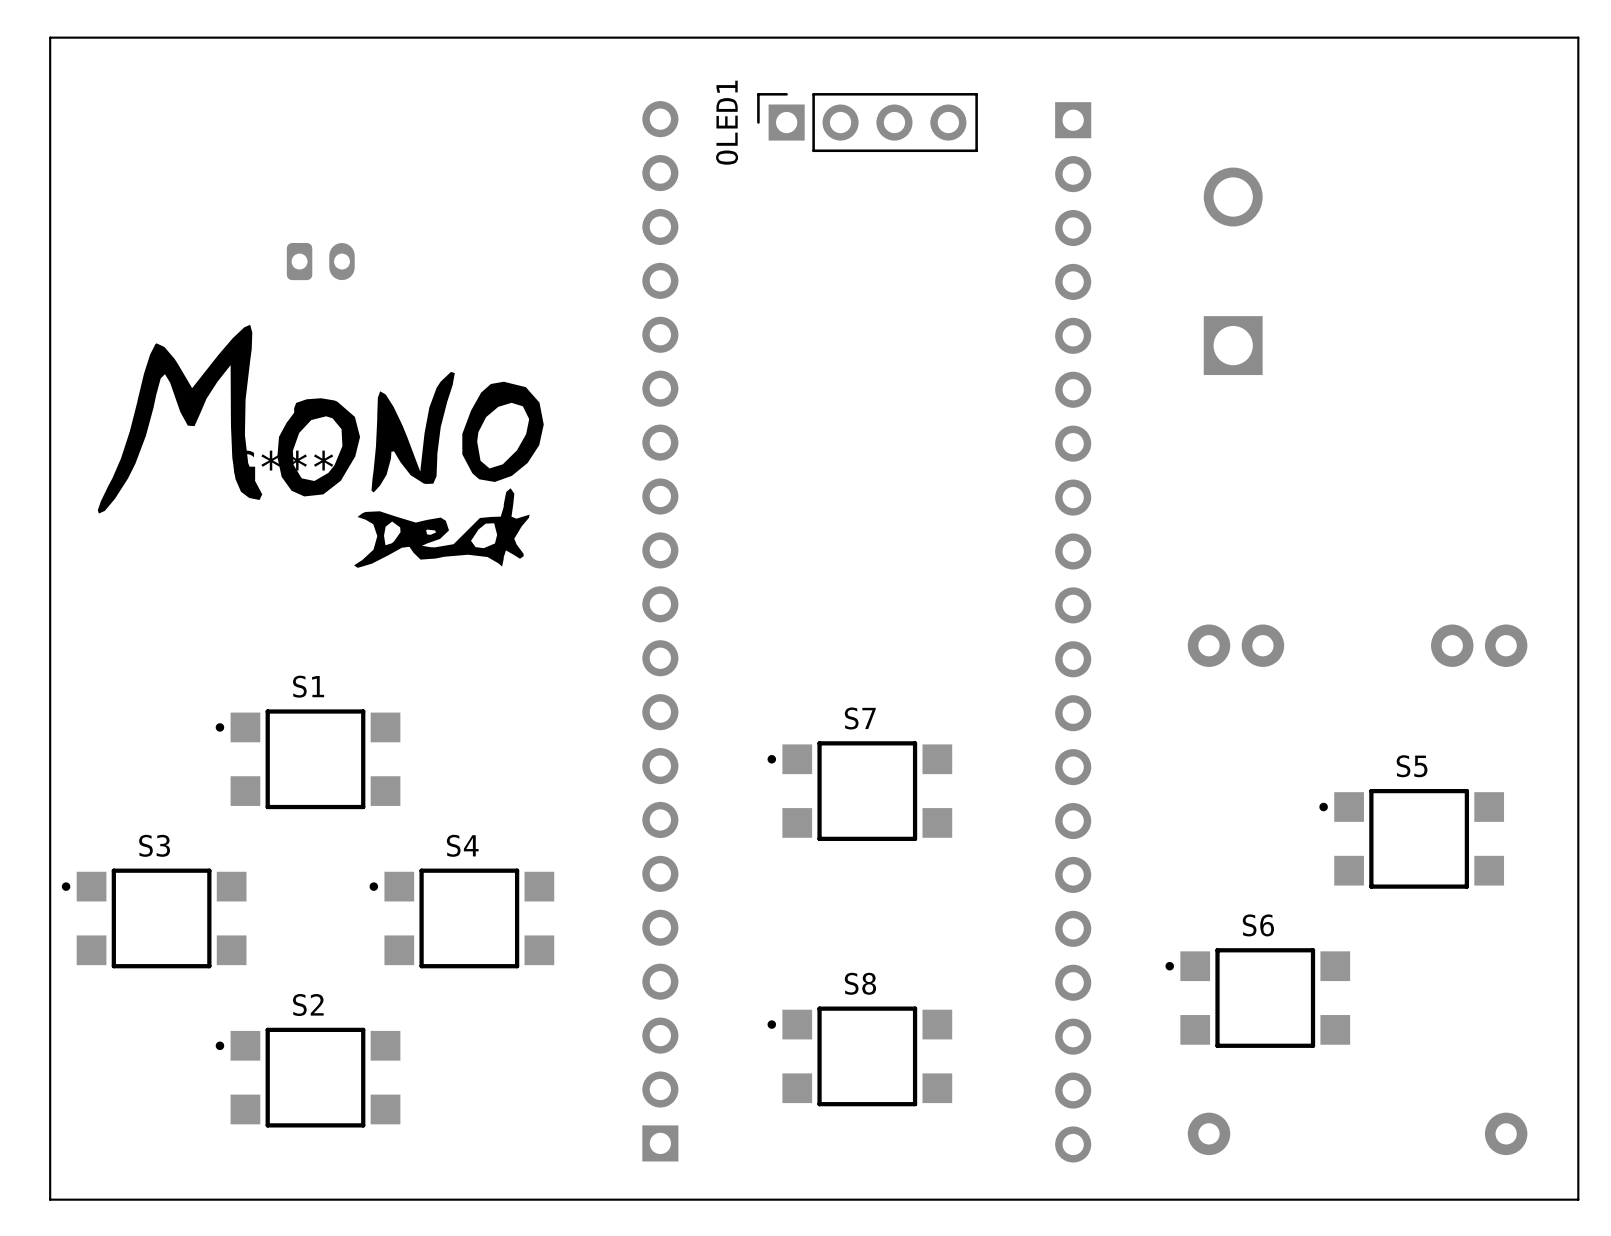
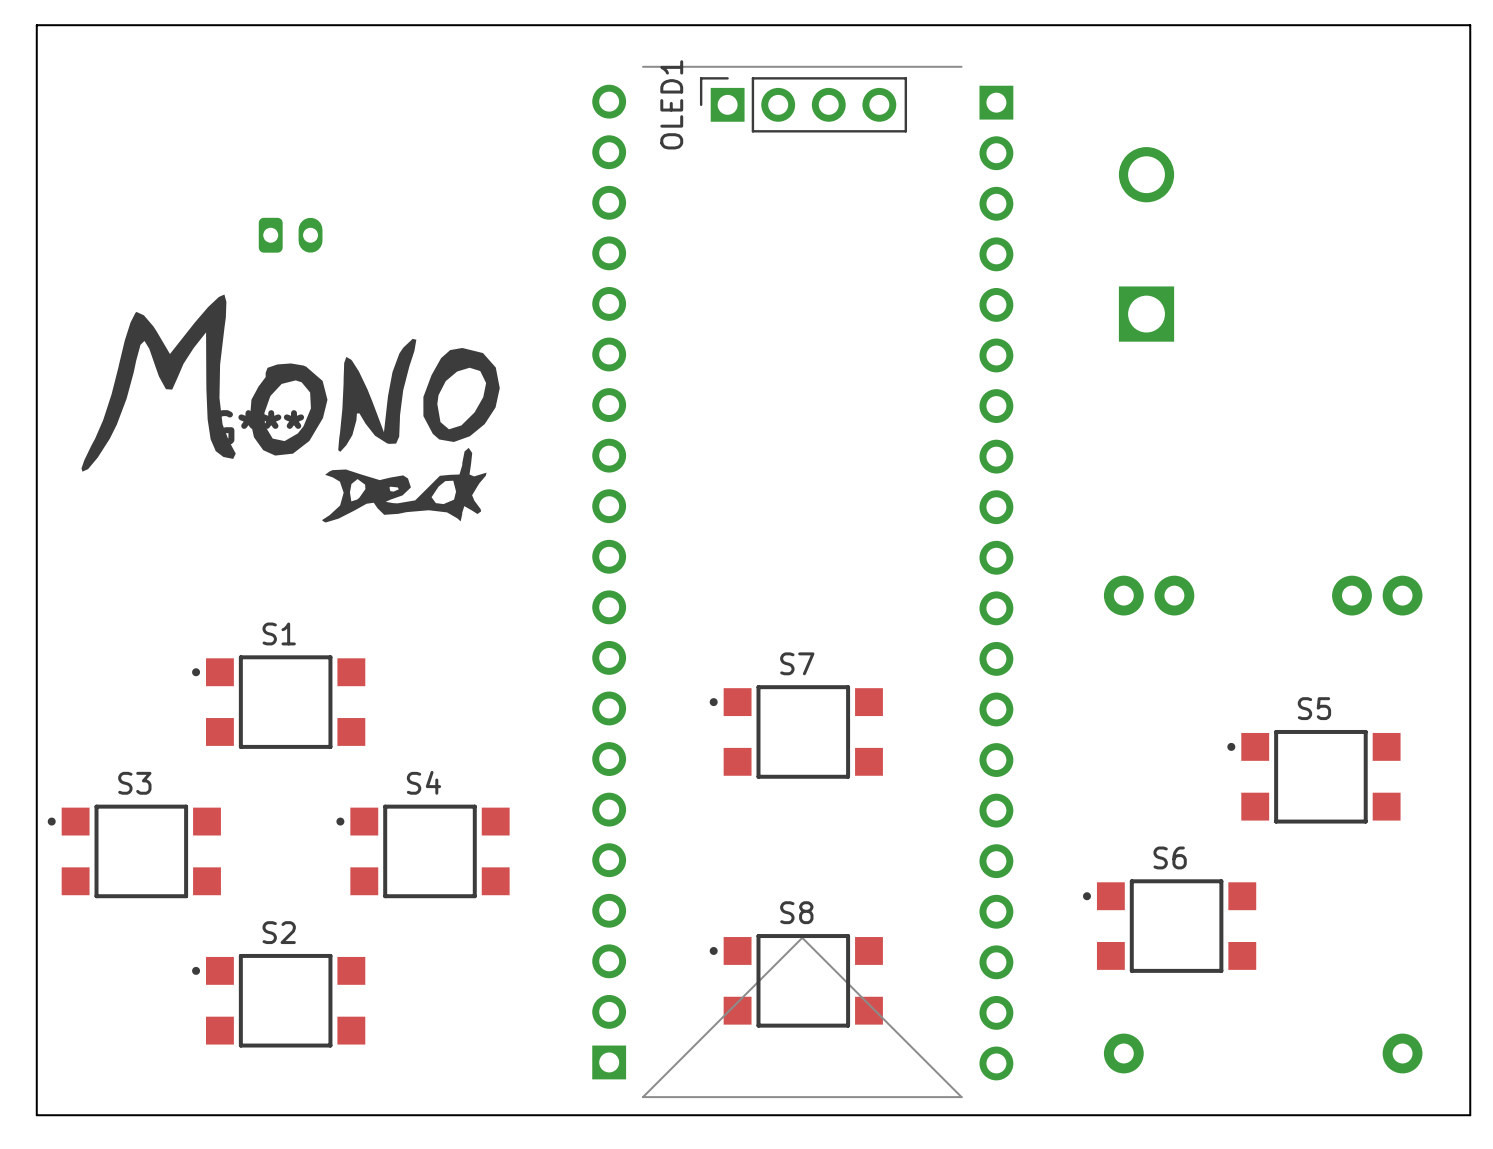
line: none -> (643, 66) (961, 66)
line: none -> (802, 937) (643, 1097) (961, 1097) (802, 937)

